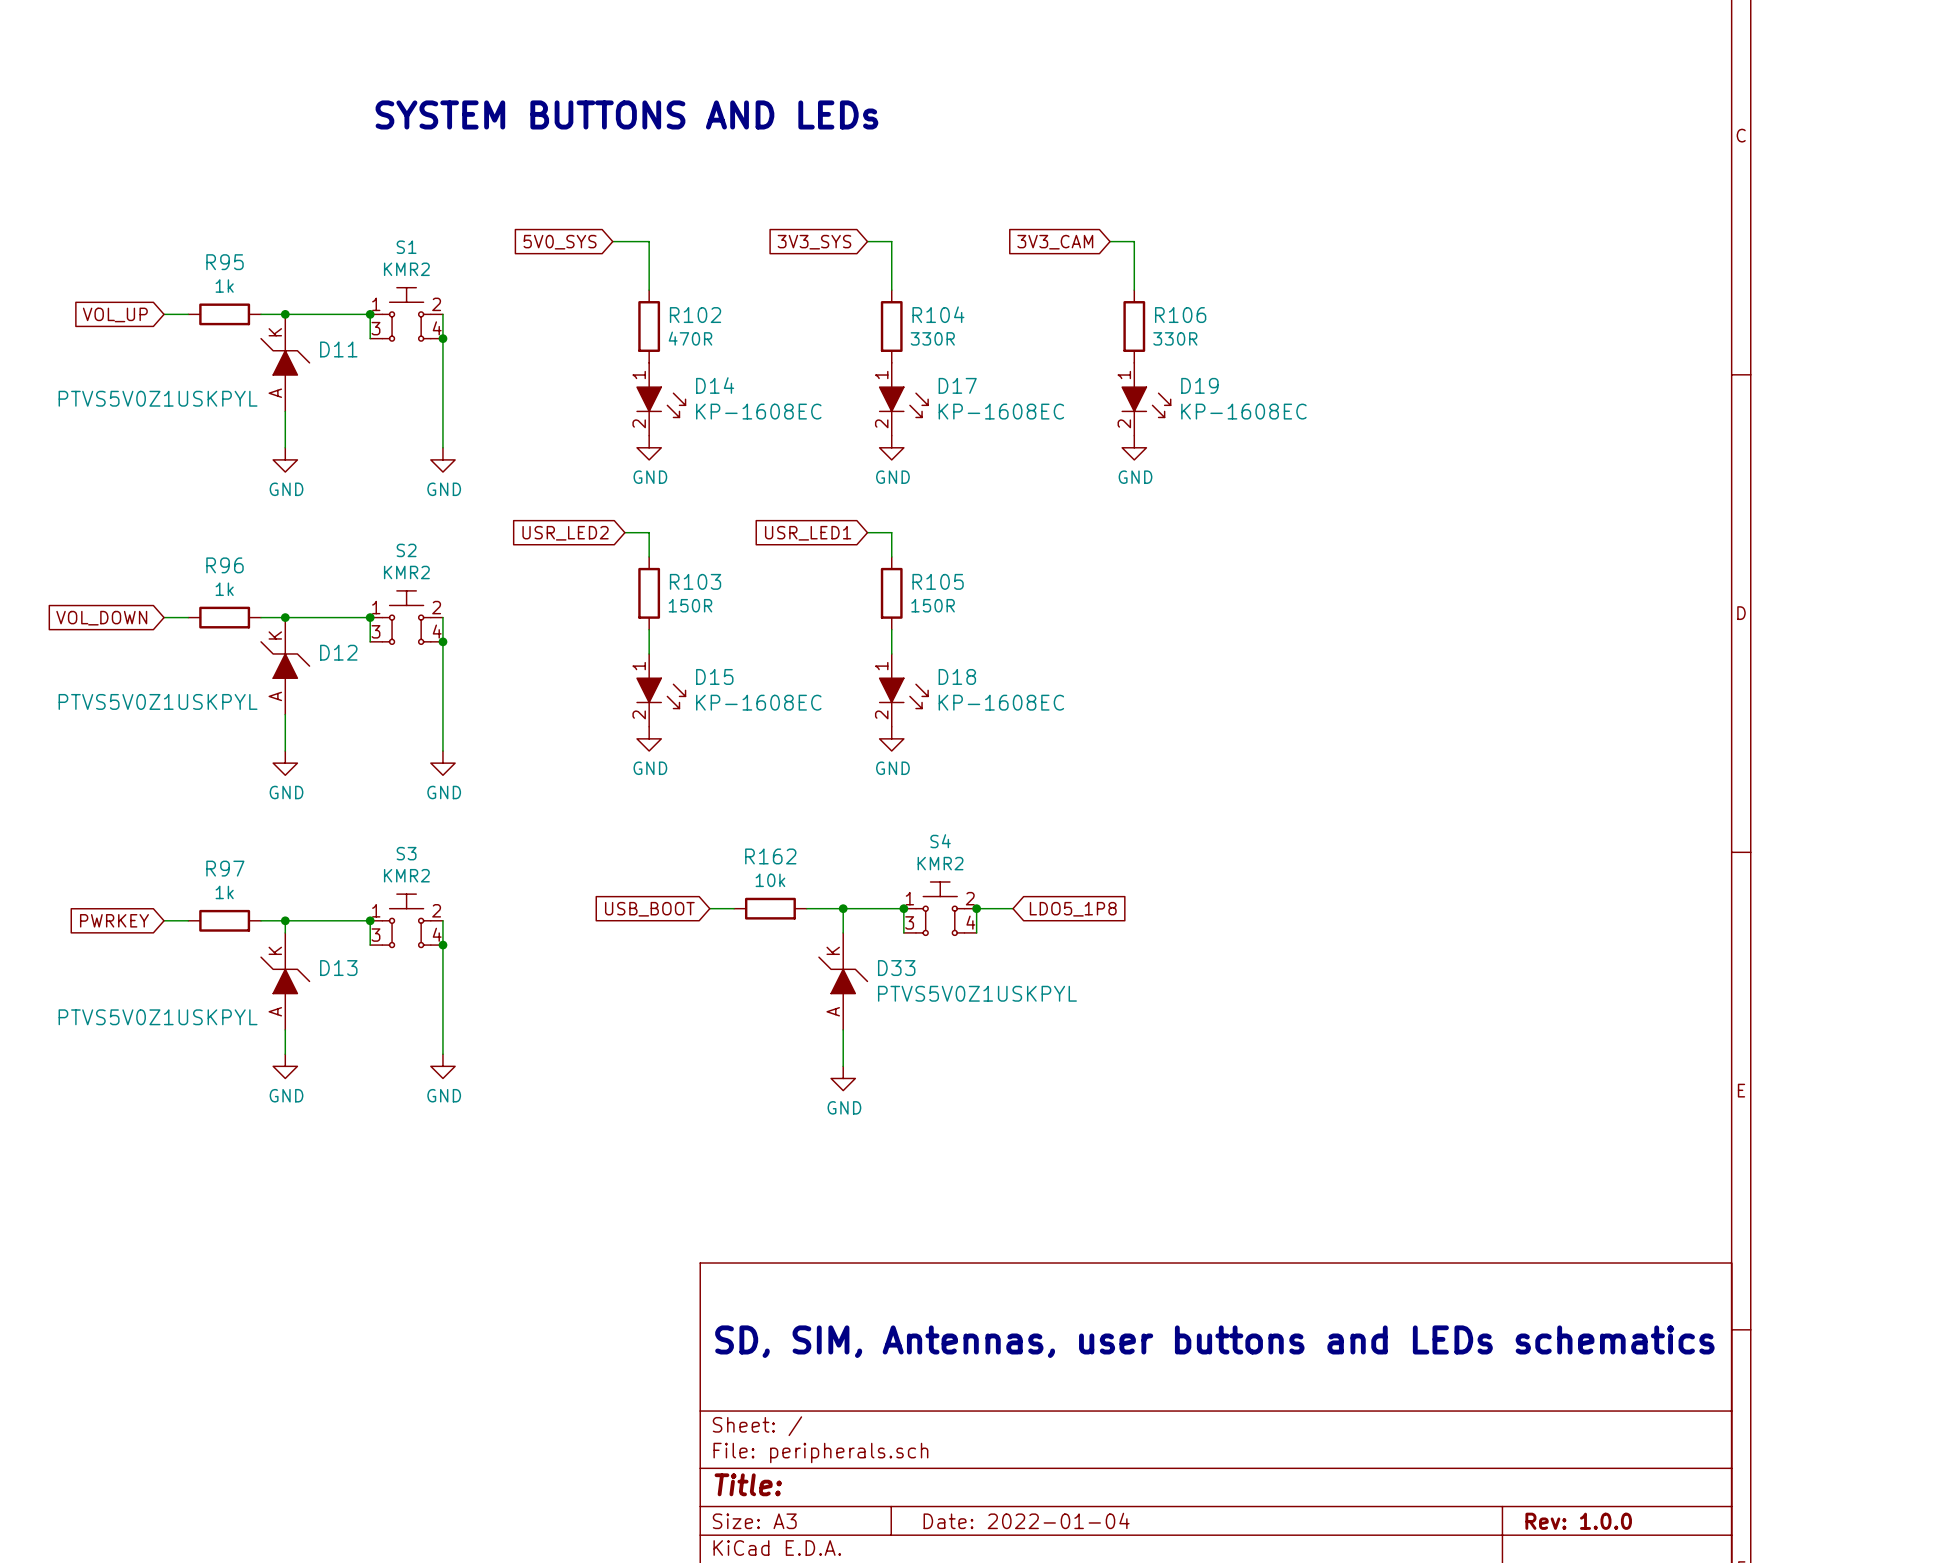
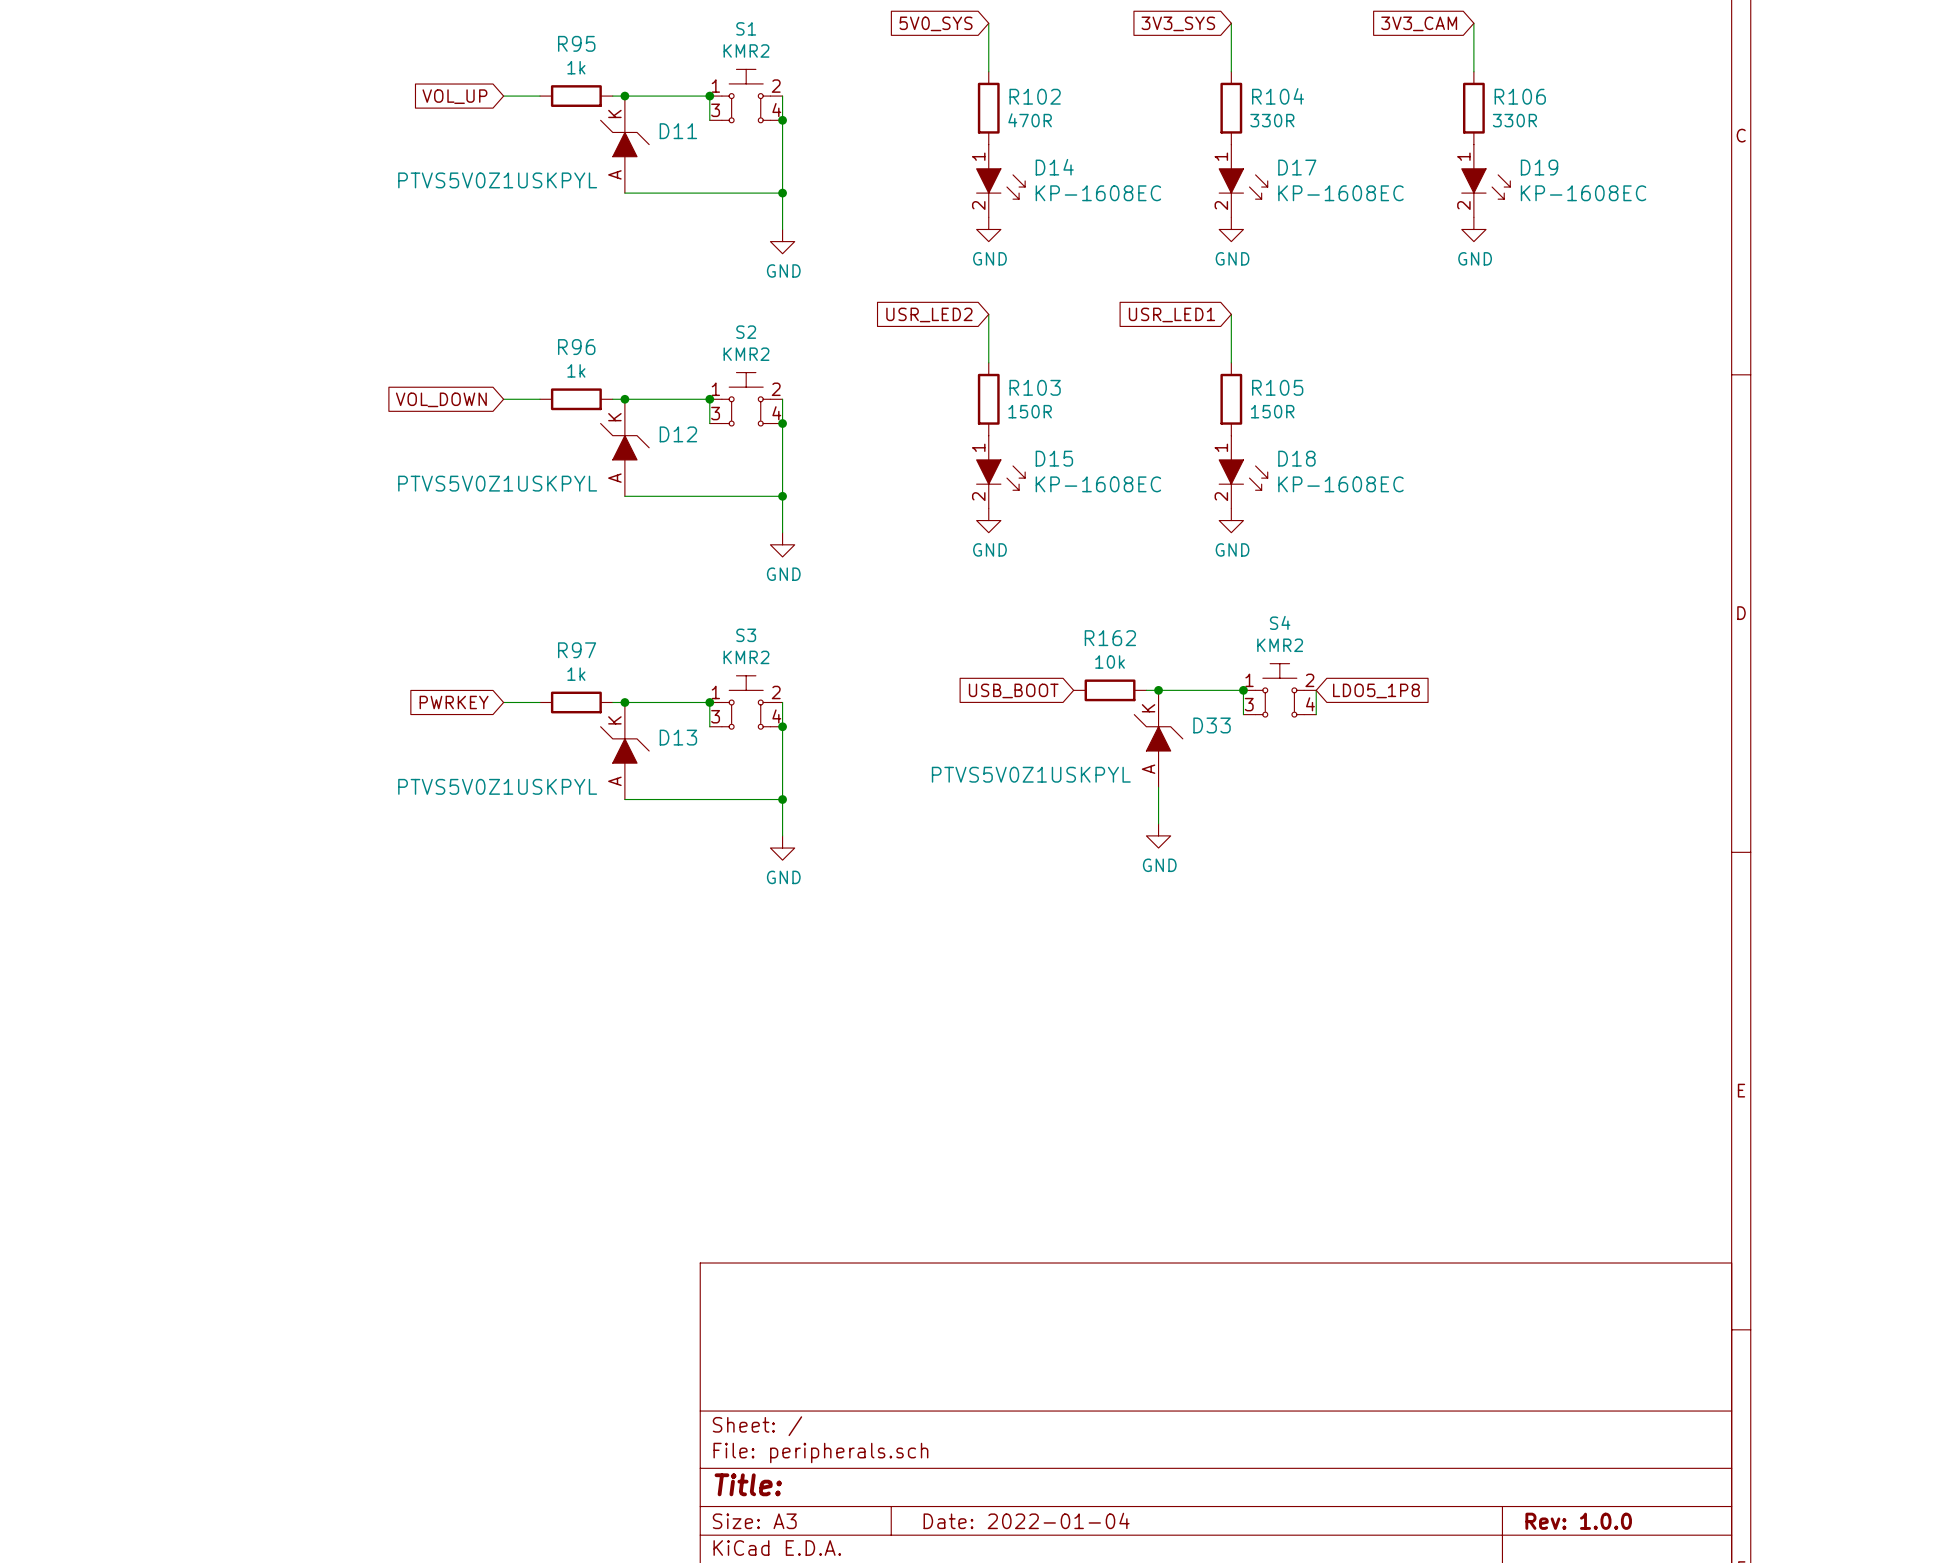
global label: none -> 5V0_SYS (936, 23)
wire: none -> (988, 23) (988, 71)
global label: none -> 3V3_SYS (1178, 23)
wire: none -> (1231, 23) (1231, 71)
global label: none -> 3V3_CAM (1419, 23)
wire: none -> (1473, 23) (1473, 71)
global label: none -> VOL_UP (454, 96)
wire: none -> (503, 96) (540, 96)
wire: none -> (612, 96) (709, 96) (709, 120)
junction: none -> (624, 96)
junction: none -> (709, 96)
wire: none -> (782, 96) (782, 229)
text: SYSTEM BUTTONS AND LEDs (626, 114) -> none
junction: none -> (782, 120)
wire: none -> (624, 193) (782, 193)
junction: none -> (782, 193)
power symbol: none -> GND (988, 229)
power symbol: none -> GND (1231, 229)
power symbol: none -> GND (1473, 229)
wire: (612, 241) (649, 241) (649, 290) -> none
power symbol: none -> GND (782, 241)
wire: (867, 241) (891, 241) (891, 290) -> none
wire: (1110, 241) (1134, 241) (1134, 290) -> none
global label: 5V0_SYS (560, 242) -> none
global label: 3V3_SYS (814, 242) -> none
global label: 3V3_CAM (1055, 242) -> none
global label: VOL_UP (115, 314) -> none
wire: (164, 314) (188, 314) -> none
R95 position: (224, 314) -> (576, 96)
wire: (261, 314) (370, 314) (370, 338) -> none
junction: (285, 314) -> none
junction: (370, 314) -> none
S1 position: (406, 314) -> (746, 96)
wire: (442, 314) (442, 447) -> none
global label: none -> USR_LED2 (929, 314)
wire: none -> (988, 314) (988, 362)
global label: none -> USR_LED1 (1171, 314)
wire: none -> (1231, 314) (1231, 362)
R102 position: (649, 326) -> (988, 108)
R104 position: (891, 326) -> (1231, 108)
R106 position: (1134, 326) -> (1473, 108)
junction: (442, 338) -> none
D11 position: (285, 362) -> (624, 144)
global label: none -> VOL_DOWN (441, 399)
wire: none -> (503, 399) (540, 399)
wire: none -> (612, 399) (709, 399) (709, 423)
junction: none -> (624, 399)
D14 position: (661, 399) -> (1000, 180)
junction: none -> (709, 399)
wire: none -> (782, 399) (782, 532)
D17 position: (903, 399) -> (1243, 180)
D19 position: (1146, 399) -> (1486, 180)
wire: (285, 411) (285, 447) -> none
junction: none -> (782, 423)
power symbol: GND (649, 447) -> none
power symbol: GND (891, 447) -> none
power symbol: GND (1134, 447) -> none
power symbol: GND (285, 459) -> none
power symbol: GND (442, 459) -> none
wire: none -> (624, 496) (782, 496)
junction: none -> (782, 496)
power symbol: none -> GND (988, 520)
power symbol: none -> GND (1231, 520)
wire: (624, 532) (649, 532) (649, 556) -> none
wire: (867, 532) (891, 532) (891, 556) -> none
global label: USR_LED2 (565, 533) -> none
global label: USR_LED1 (808, 533) -> none
power symbol: none -> GND (782, 544)
R103 position: (649, 593) -> (988, 399)
R105 position: (891, 593) -> (1231, 399)
wire: (164, 617) (188, 617) -> none
R96 position: (224, 617) -> (576, 399)
wire: (261, 617) (370, 617) (370, 641) -> none
junction: (285, 617) -> none
junction: (370, 617) -> none
S2 position: (406, 617) -> (746, 399)
wire: (442, 617) (442, 751) -> none
global label: VOL_DOWN (101, 618) -> none
wire: (649, 629) (649, 653) -> none
wire: (891, 629) (891, 653) -> none
junction: (442, 641) -> none
D12 position: (285, 666) -> (624, 447)
D15 position: (661, 690) -> (1000, 472)
D18 position: (903, 690) -> (1243, 472)
global label: none -> USB_BOOT (1013, 690)
wire: none -> (1146, 690) (1243, 690) (1243, 714)
junction: none -> (1158, 690)
junction: none -> (1243, 690)
wire: none -> (1316, 690) (1316, 714)
global label: none -> LDO5_1P8 (1376, 690)
global label: none -> PWRKEY (454, 702)
wire: none -> (503, 702) (540, 702)
wire: none -> (612, 702) (709, 702) (709, 726)
junction: none -> (624, 702)
junction: none -> (709, 702)
wire: none -> (782, 702) (782, 835)
wire: (285, 714) (285, 751) -> none
junction: none -> (782, 726)
power symbol: GND (649, 738) -> none
power symbol: GND (891, 738) -> none
power symbol: GND (285, 763) -> none
power symbol: GND (442, 763) -> none
wire: none -> (1158, 787) (1158, 823)
wire: none -> (624, 799) (782, 799)
junction: none -> (782, 799)
power symbol: none -> GND (1158, 835)
power symbol: none -> GND (782, 848)
wire: (709, 908) (734, 908) -> none
R162 position: (770, 908) -> (1110, 690)
wire: (806, 908) (903, 908) (903, 932) -> none
wire: (843, 908) (843, 932) -> none
junction: (843, 908) -> none
junction: (903, 908) -> none
S4 position: (940, 908) -> (1279, 690)
junction: (976, 908) -> none
wire: (1013, 908) (976, 908) (976, 932) -> none
global label: USB_BOOT (649, 909) -> none
global label: LDO5_1P8 (1073, 909) -> none
global label: PWRKEY (114, 920) -> none
wire: (164, 920) (188, 920) -> none
R97 position: (224, 920) -> (576, 702)
wire: (261, 920) (370, 920) (370, 945) -> none
wire: (285, 920) (285, 932) -> none
junction: (285, 920) -> none
junction: (370, 920) -> none
S3 position: (406, 920) -> (746, 702)
wire: (442, 920) (442, 1054) -> none
junction: (442, 945) -> none
D13 position: (285, 981) -> (624, 751)
D33 position: (843, 981) -> (1158, 738)
D33 value position: PTVS5V0Z1USKPYL (977, 993) -> PTVS5V0Z1USKPYL (1031, 774)
wire: (285, 1029) (285, 1054) -> none
wire: (843, 1029) (843, 1066) -> none
power symbol: GND (285, 1066) -> none
power symbol: GND (442, 1066) -> none
power symbol: GND (843, 1078) -> none
text: SD, SIM, Antennas, user buttons and LEDs schematics (1214, 1341) -> none

